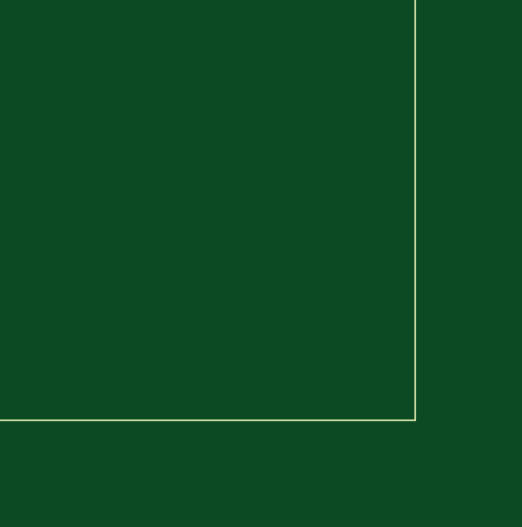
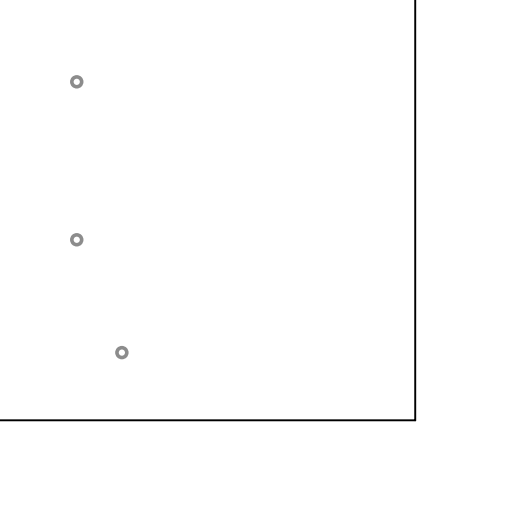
via: none -> (76, 81)
via: none -> (76, 239)
via: none -> (121, 352)

